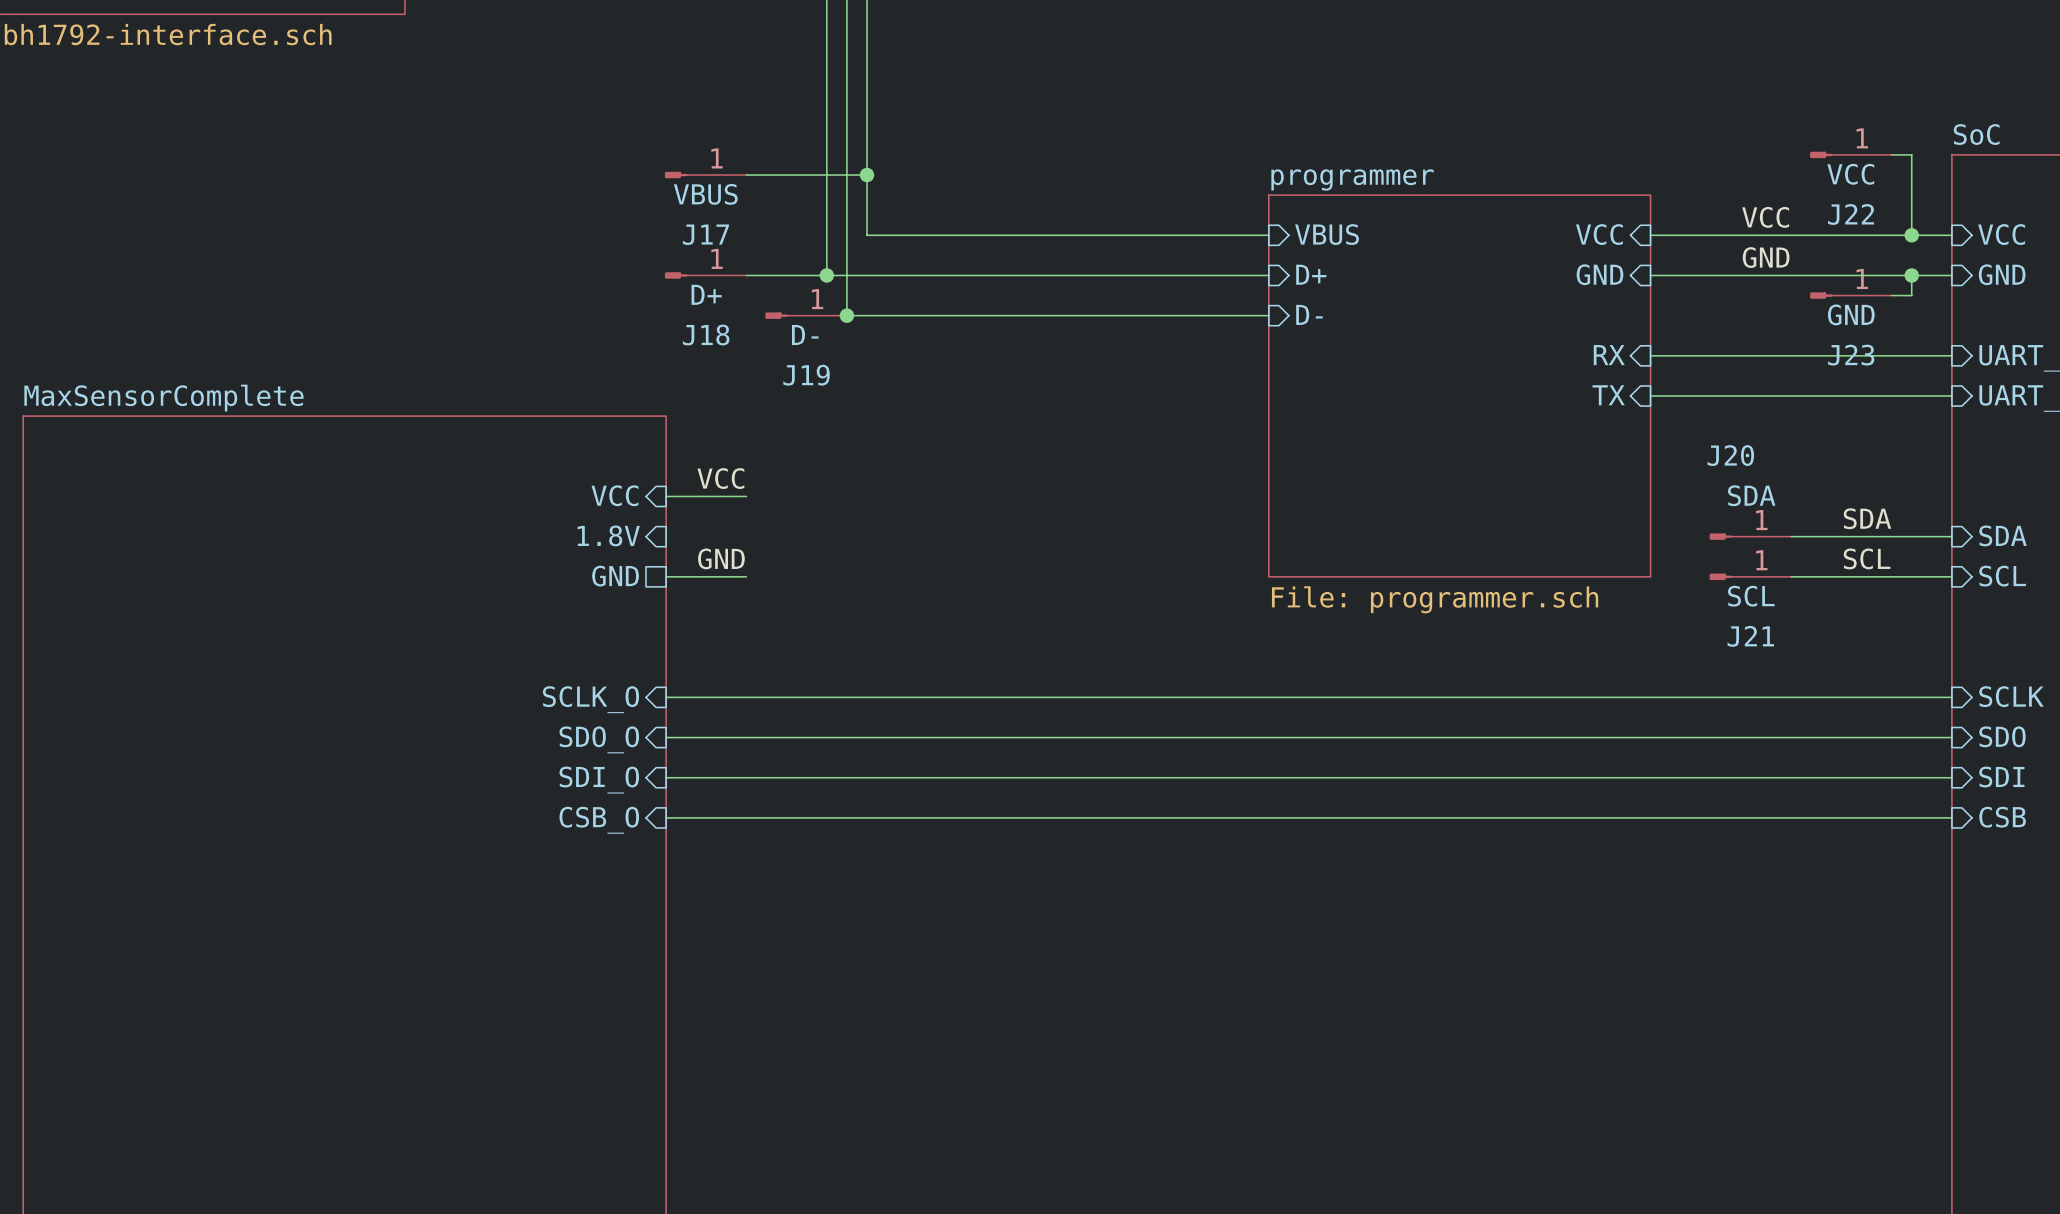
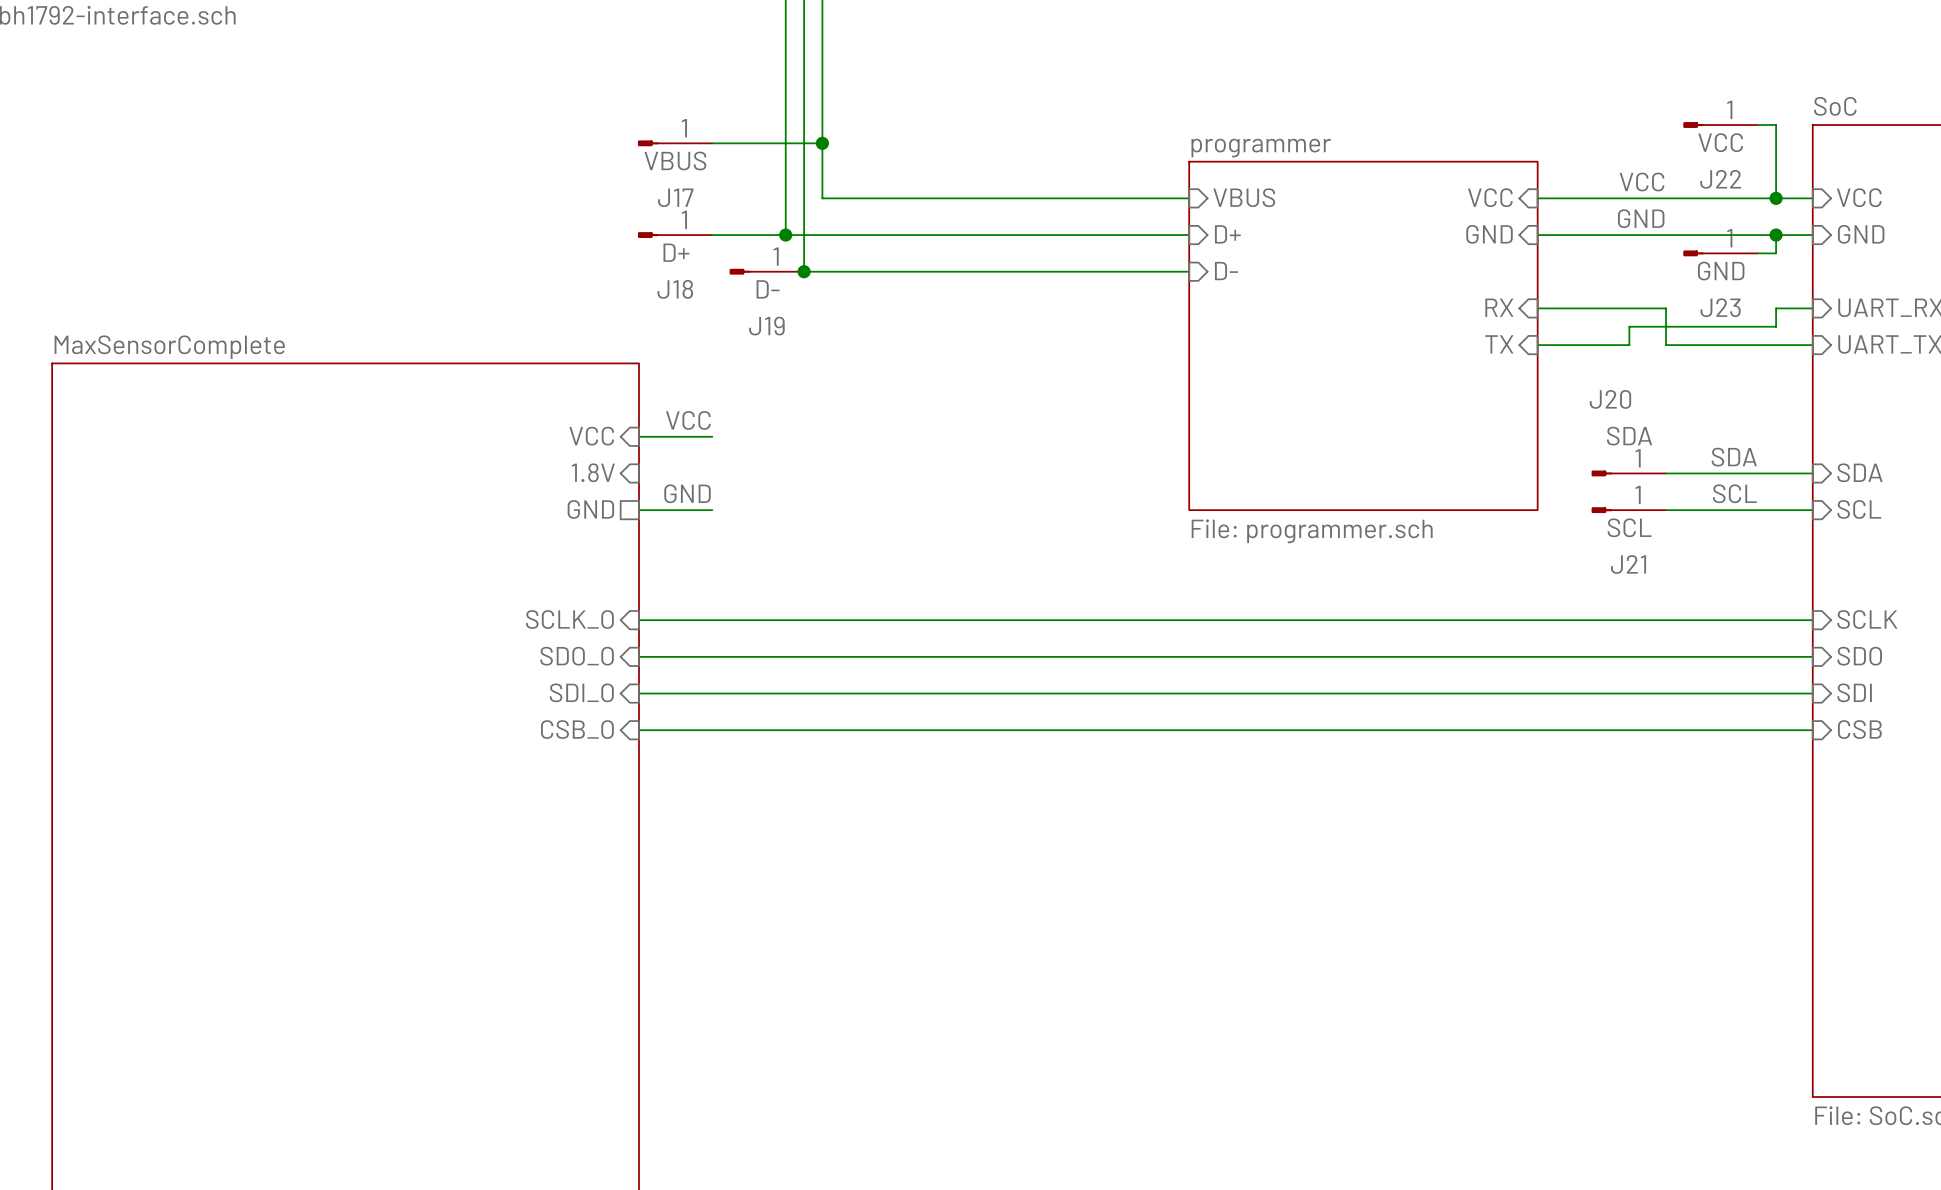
wire: (1791, 355) (1911, 355) -> (1629, 345) (1629, 326) (1776, 326) (1776, 308)
wire: (1751, 396) (1791, 396) -> (1666, 308) (1666, 345)

